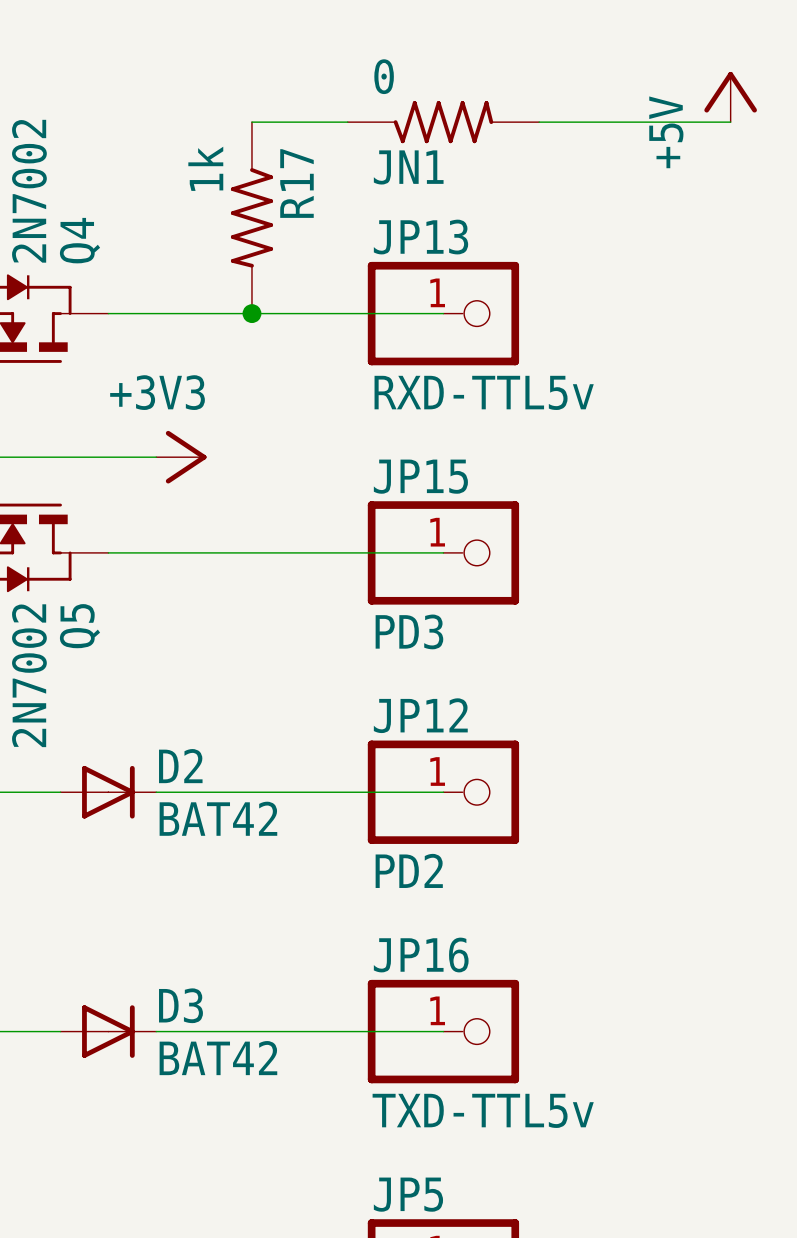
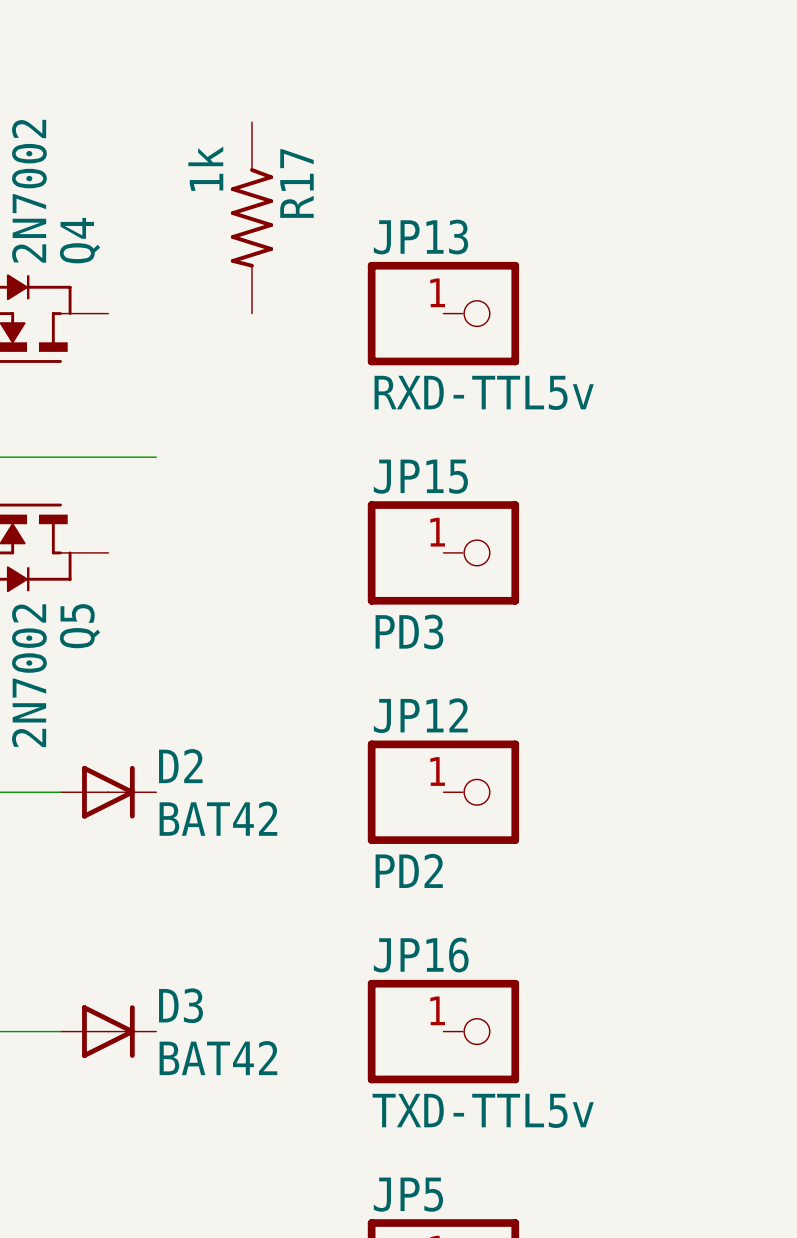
power symbol: +5V (730, 97) -> none
wire: (251, 122) (347, 122) -> none
JN1: 0 (443, 122) -> none
wire: (539, 122) (730, 122) -> none
wire: (108, 313) (443, 313) -> none
junction: (251, 313) -> none
power symbol: +3V3 (181, 457) -> none
wire: (108, 552) (443, 552) -> none
wire: (156, 792) (443, 792) -> none
wire: (156, 1031) (443, 1031) -> none

